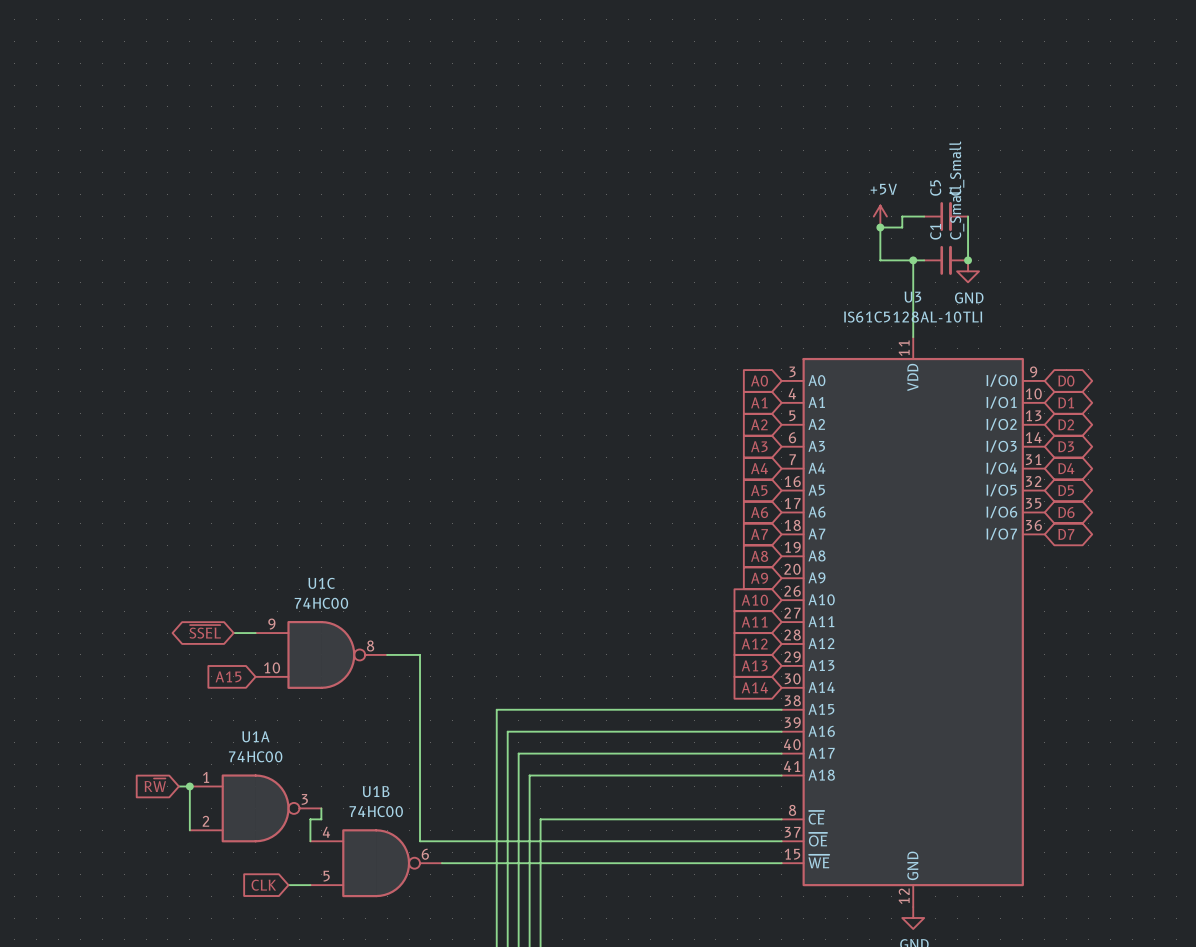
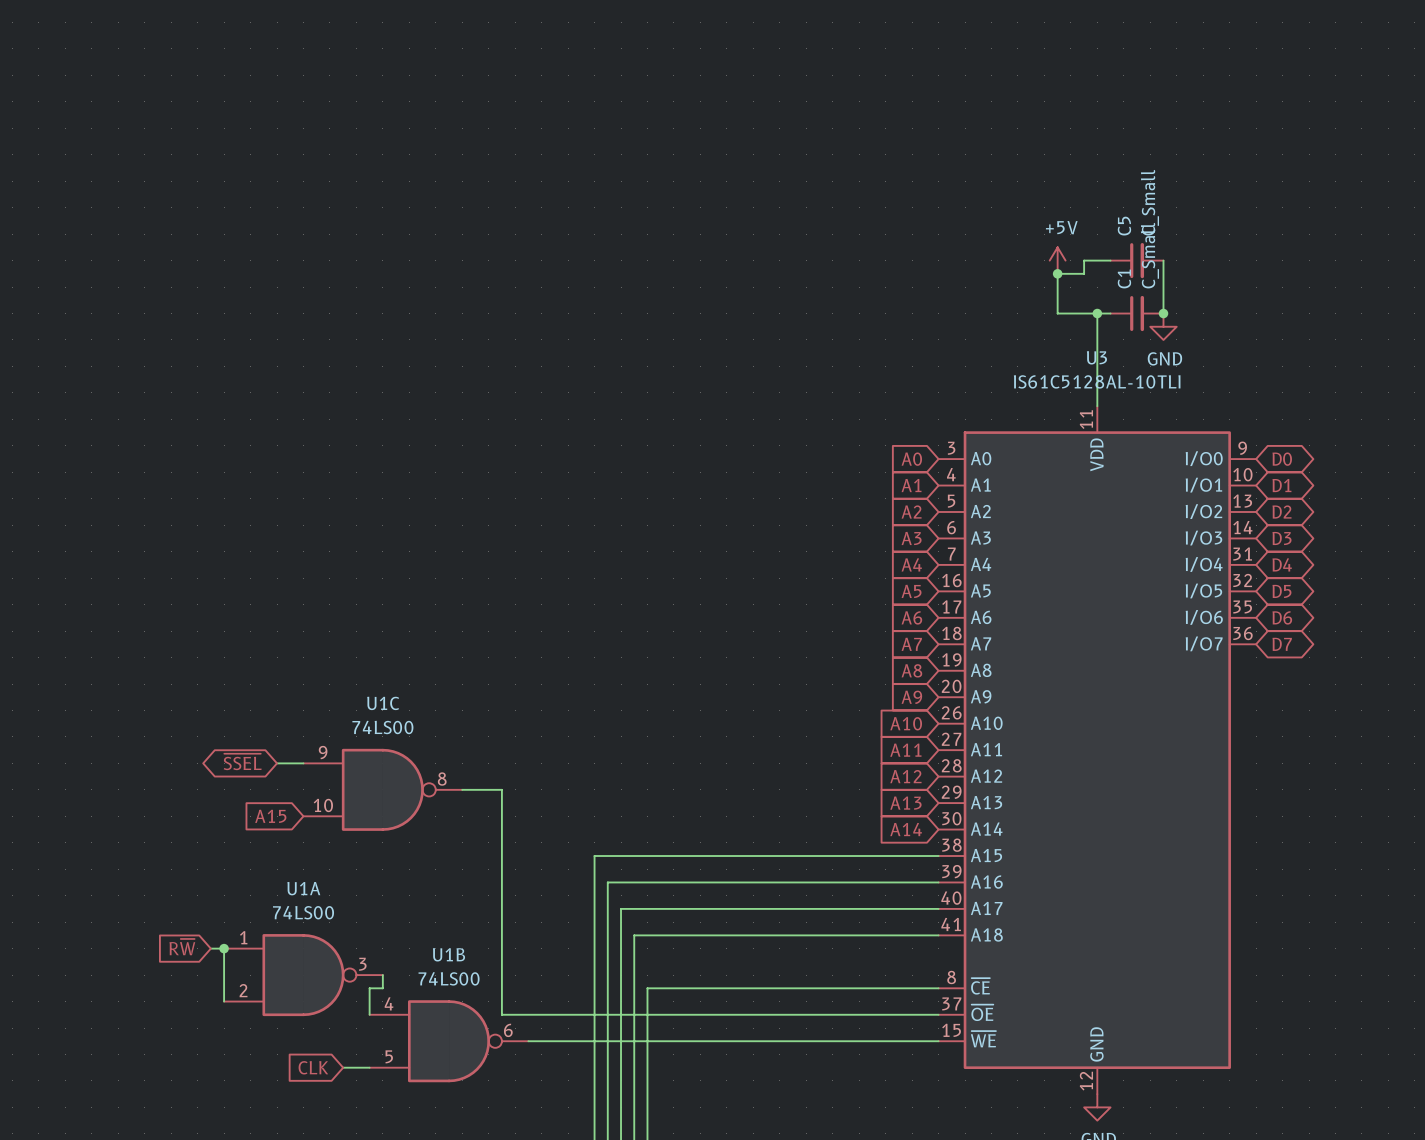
U1C value: 74HC00 (321, 603) -> 74LS00 (382, 727)
U1A value: 74HC00 (255, 756) -> 74LS00 (303, 912)
U1B value: 74HC00 (376, 811) -> 74LS00 (449, 978)

